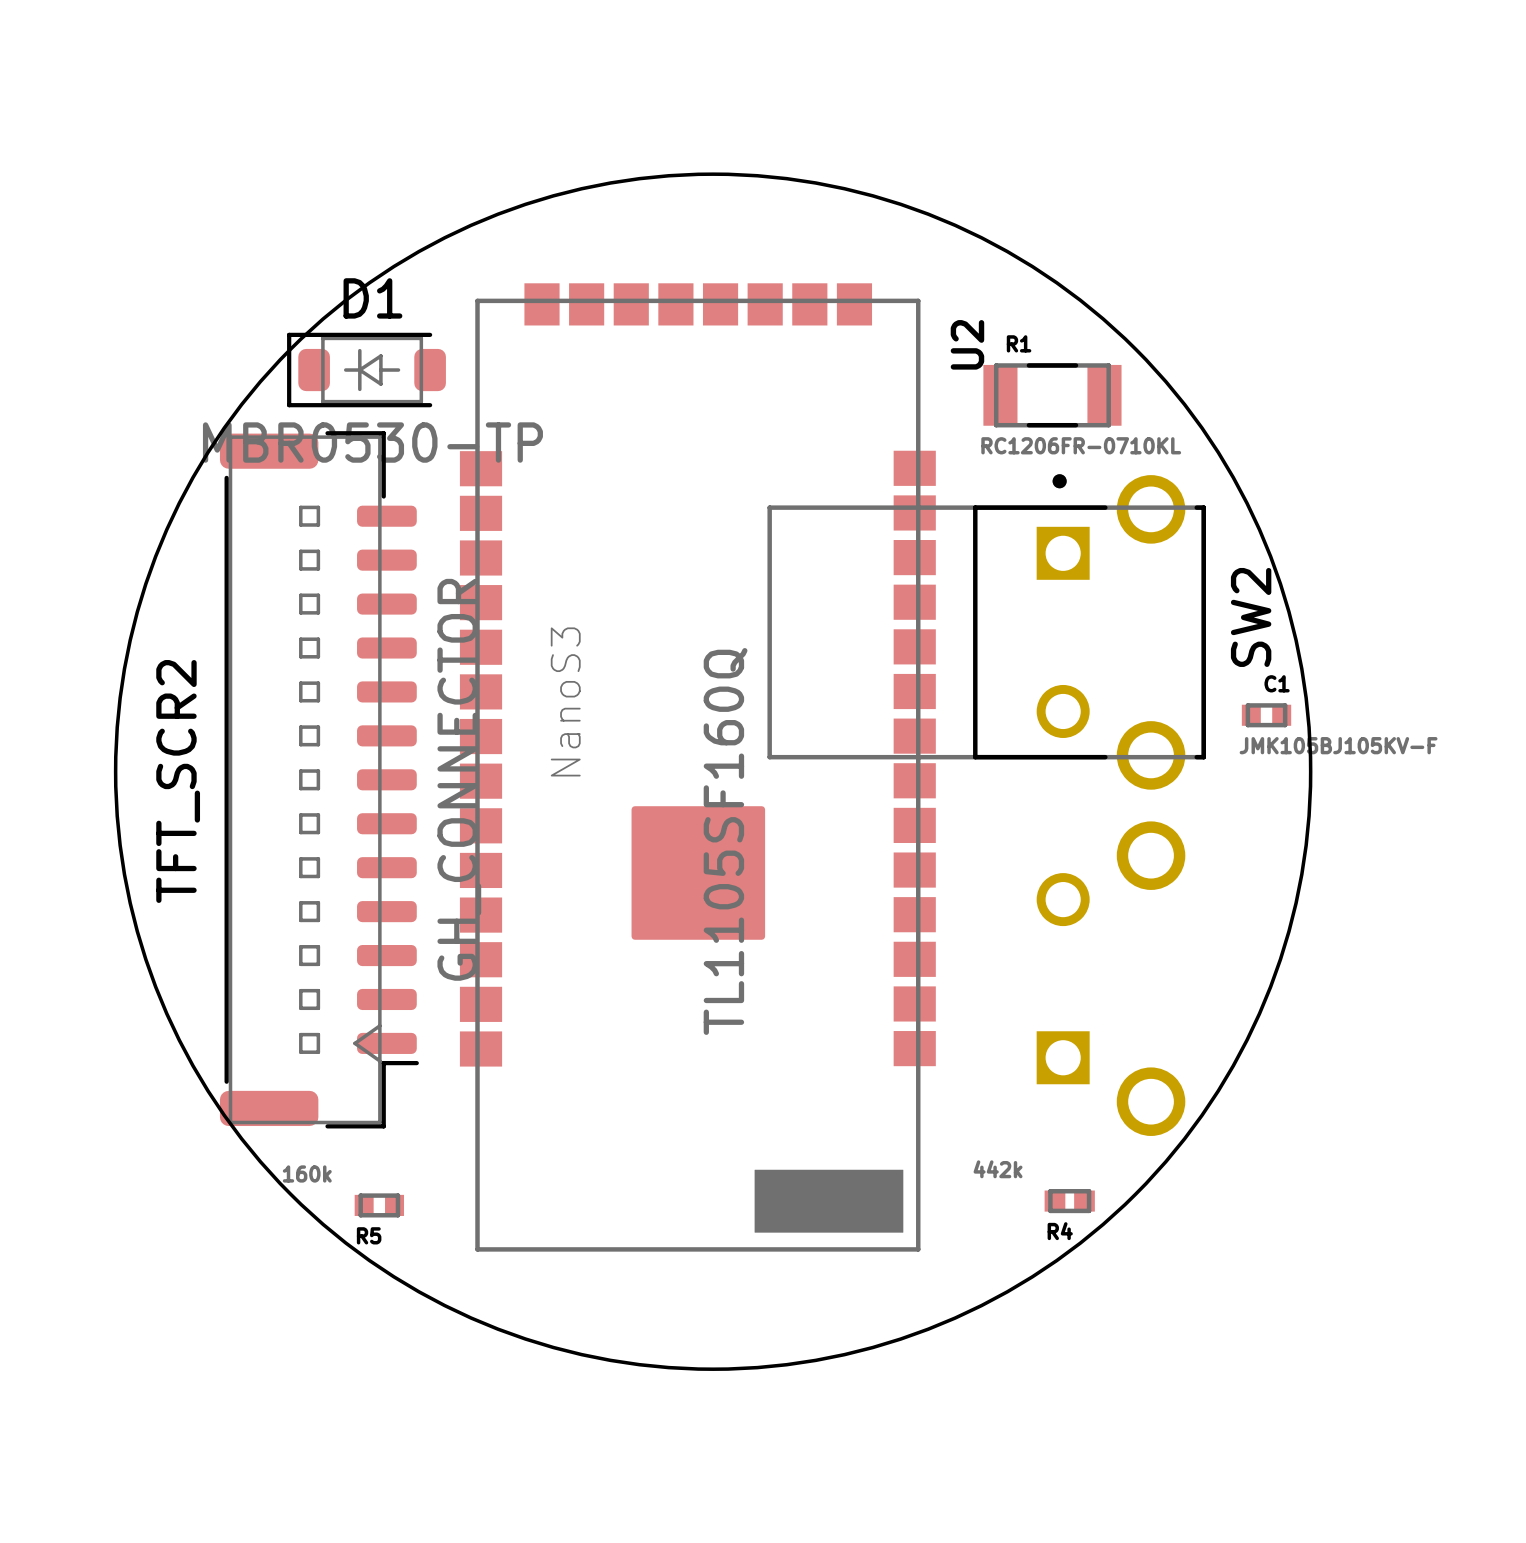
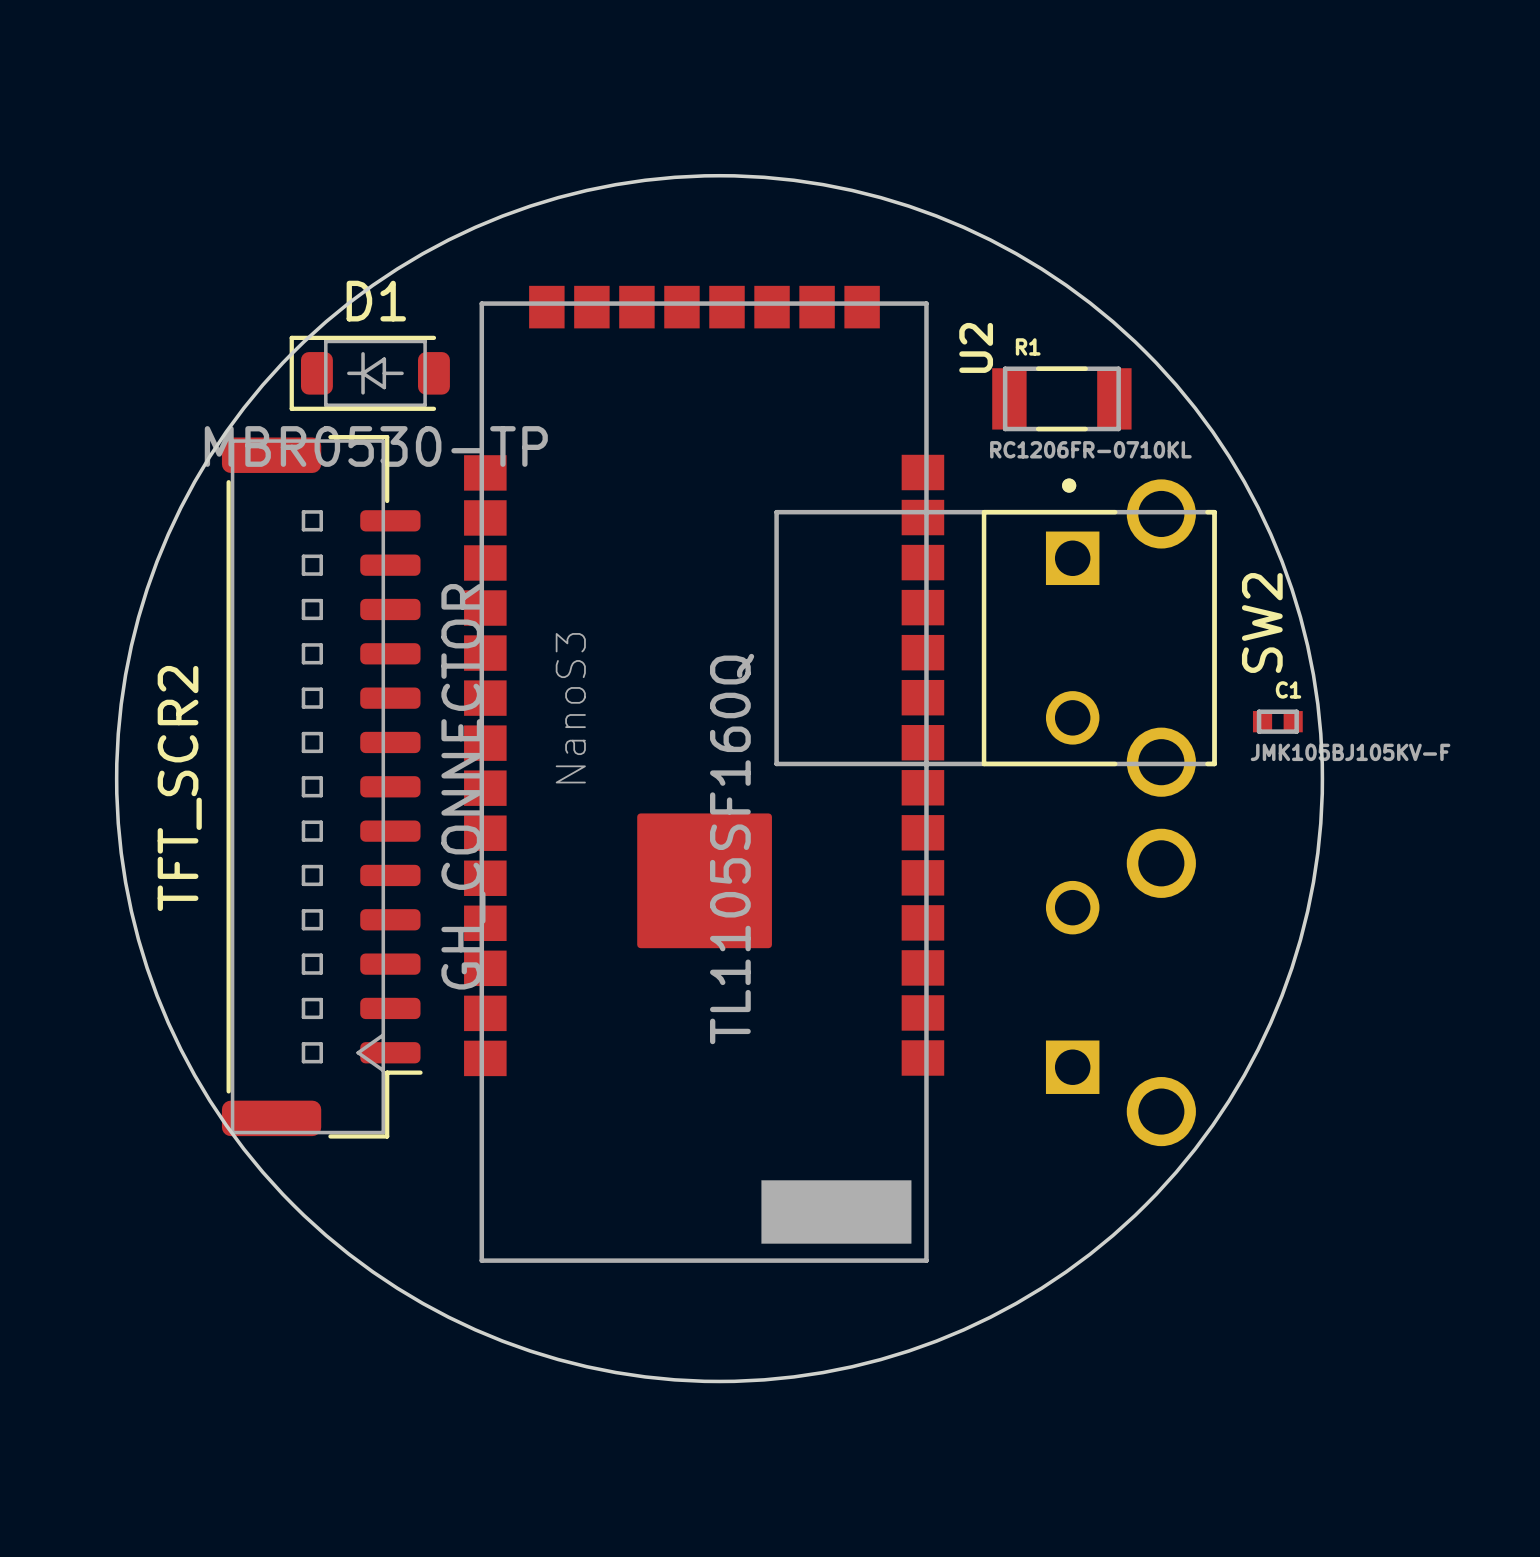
R4: 442k (1069, 1201) -> none
R5: 160k (379, 1205) -> none

